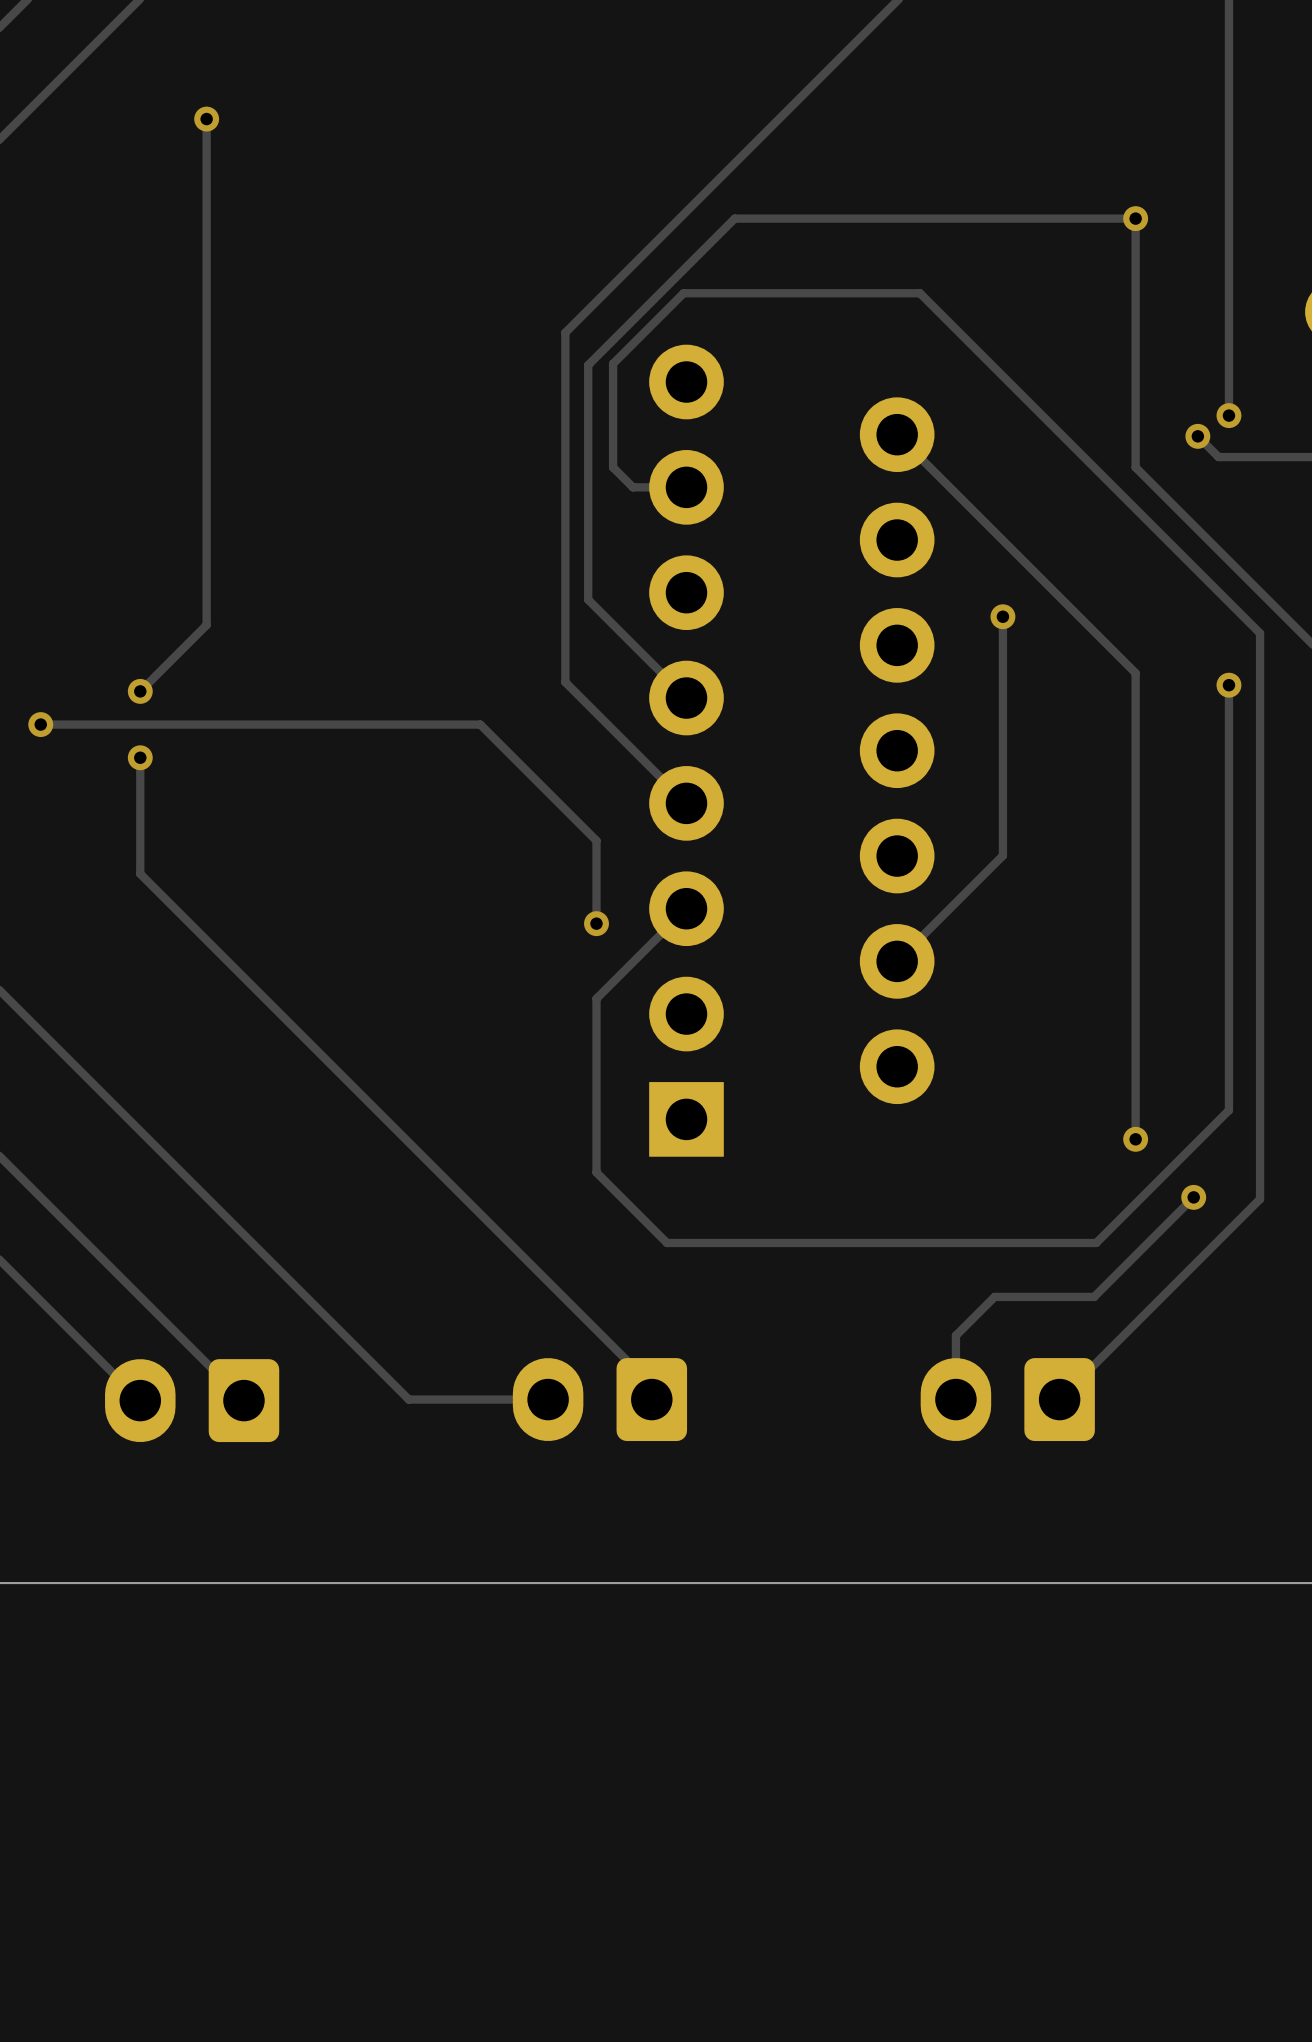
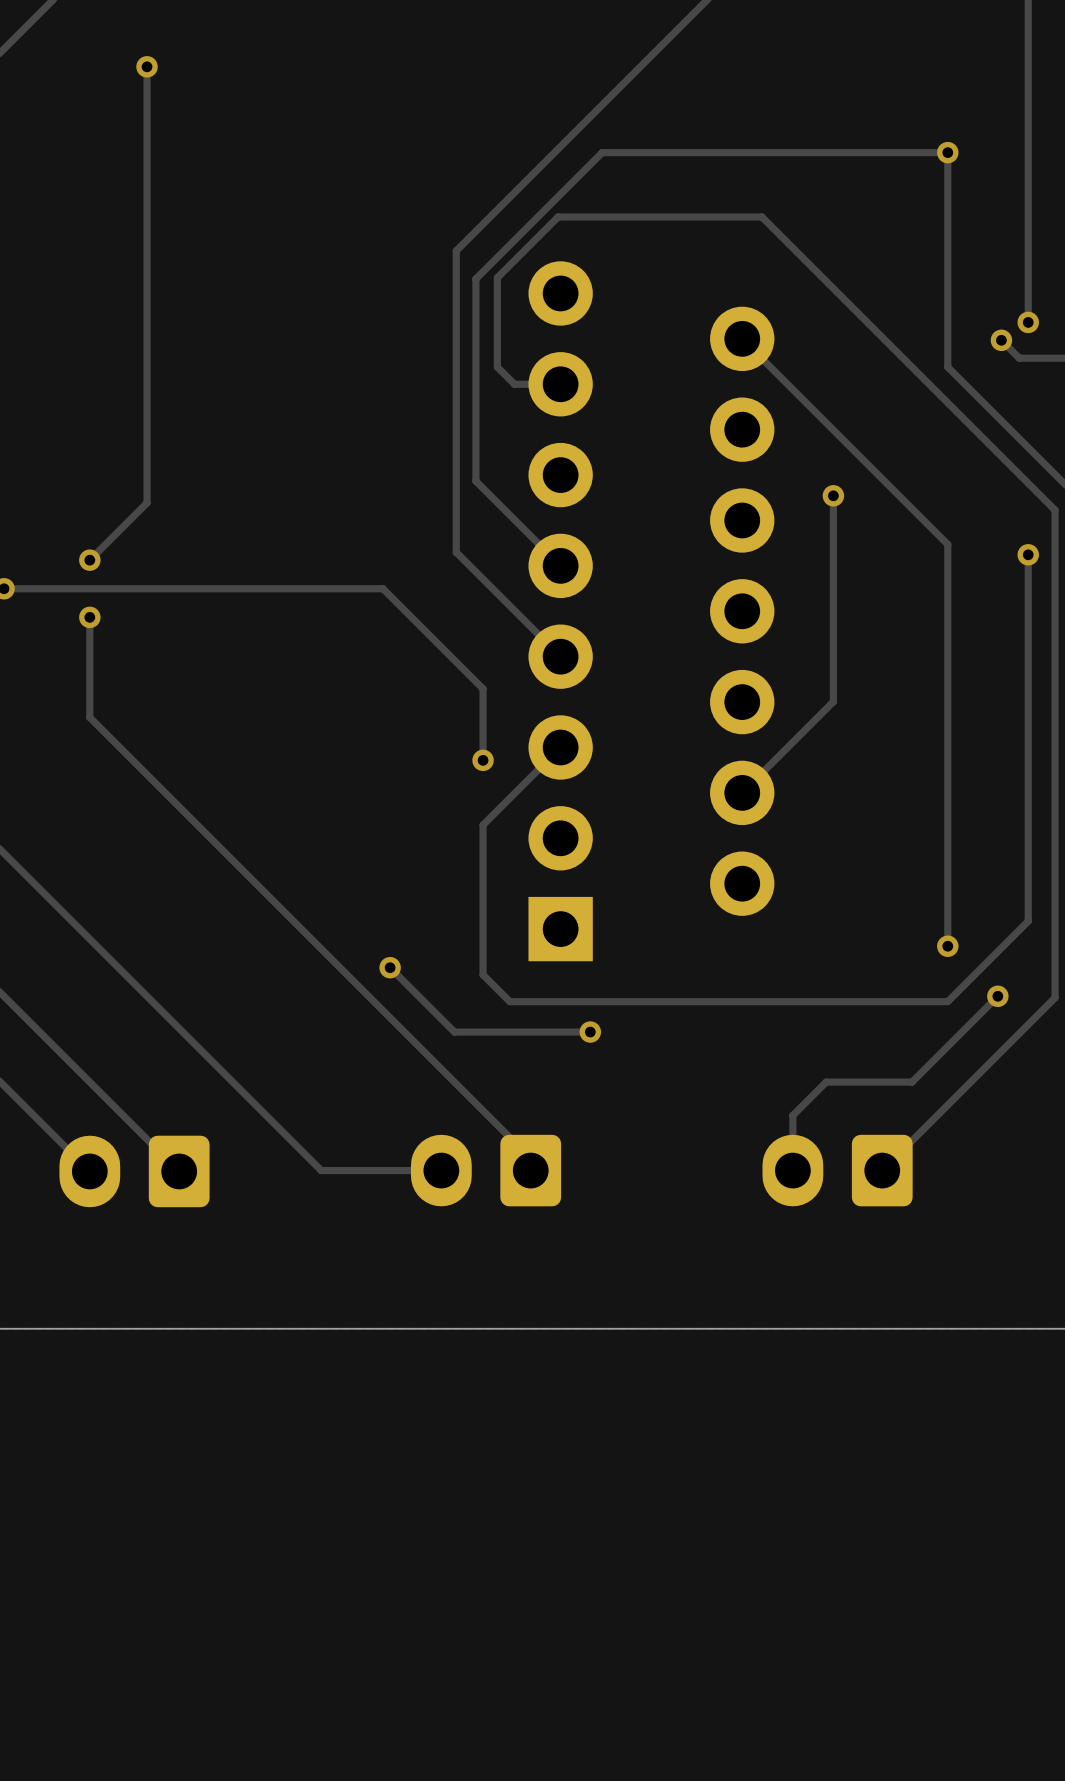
track: none -> (390, 967) (454, 1032) (590, 1032)
via: none -> (390, 967)
track: (1135, 1203) (1096, 1242) (667, 1242) (627, 1203) -> (947, 1001) (509, 1001)
via: none -> (590, 1032)

